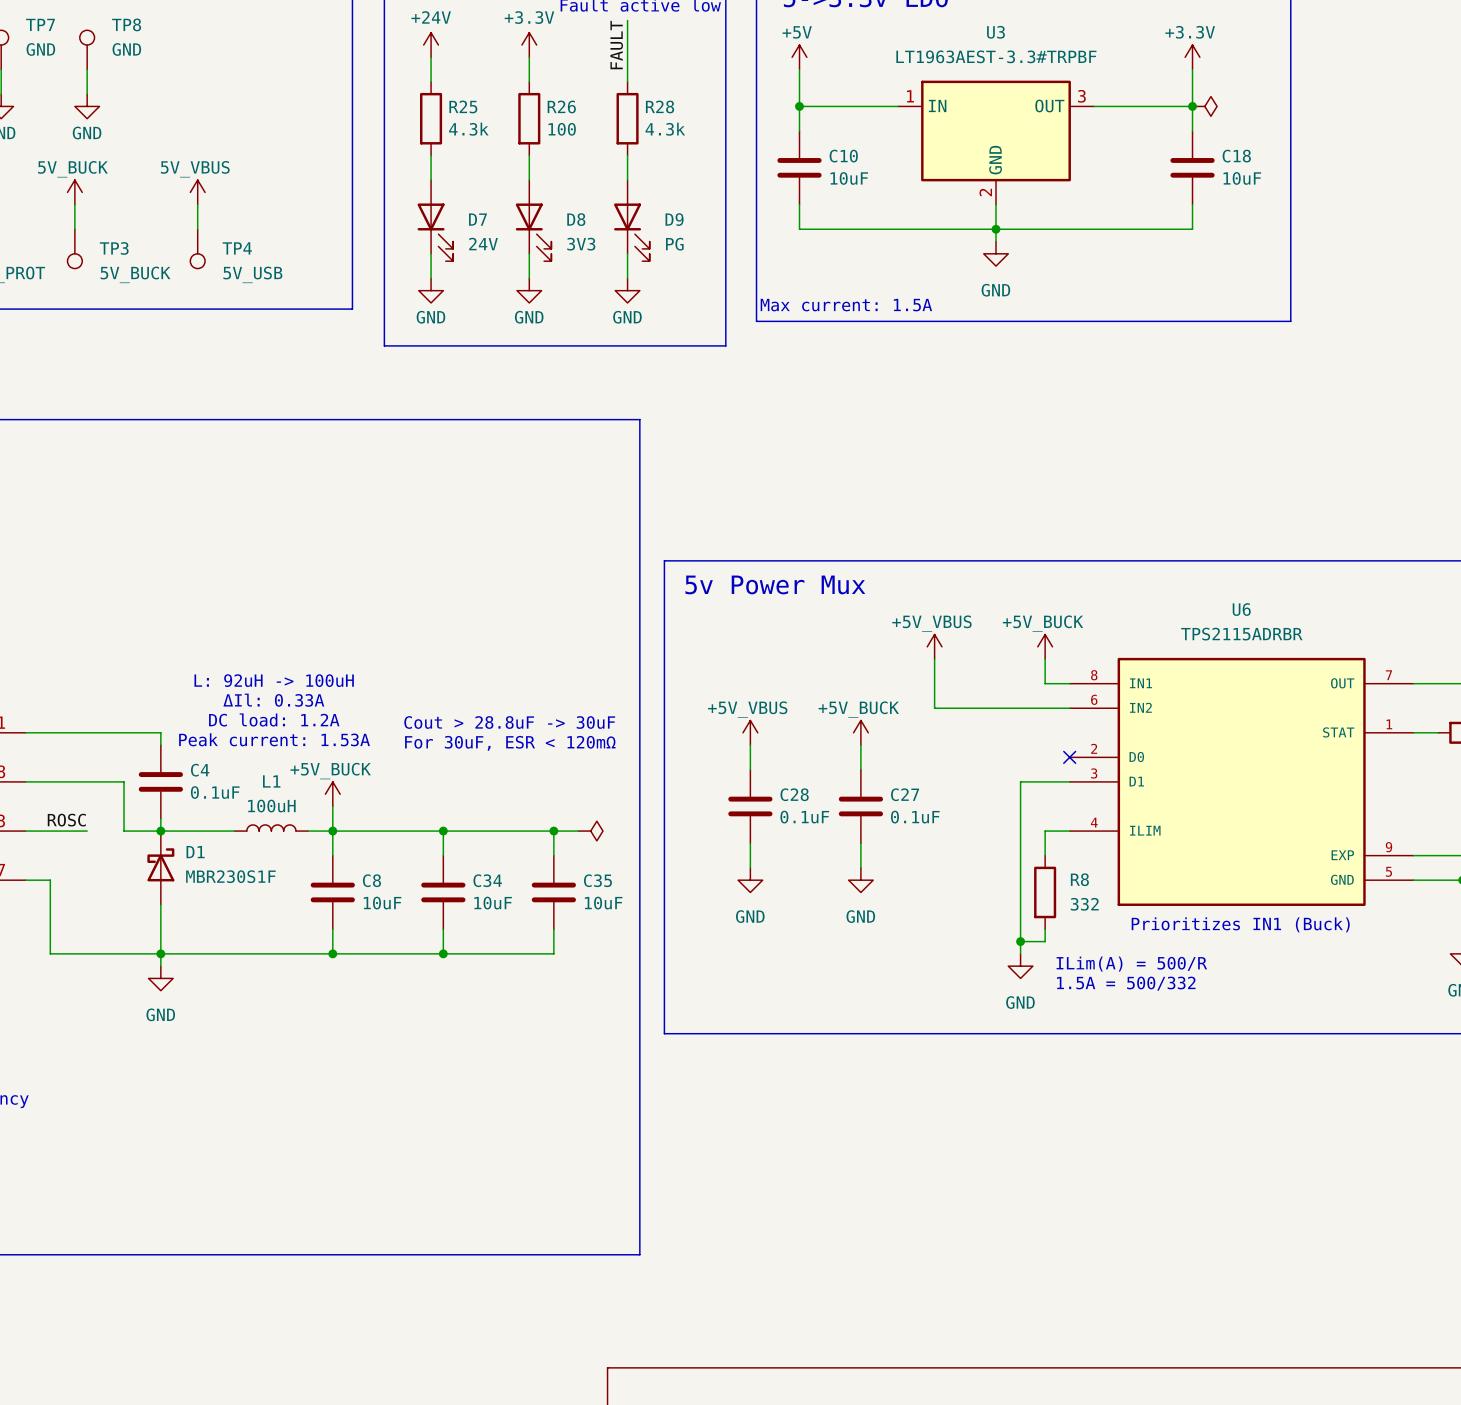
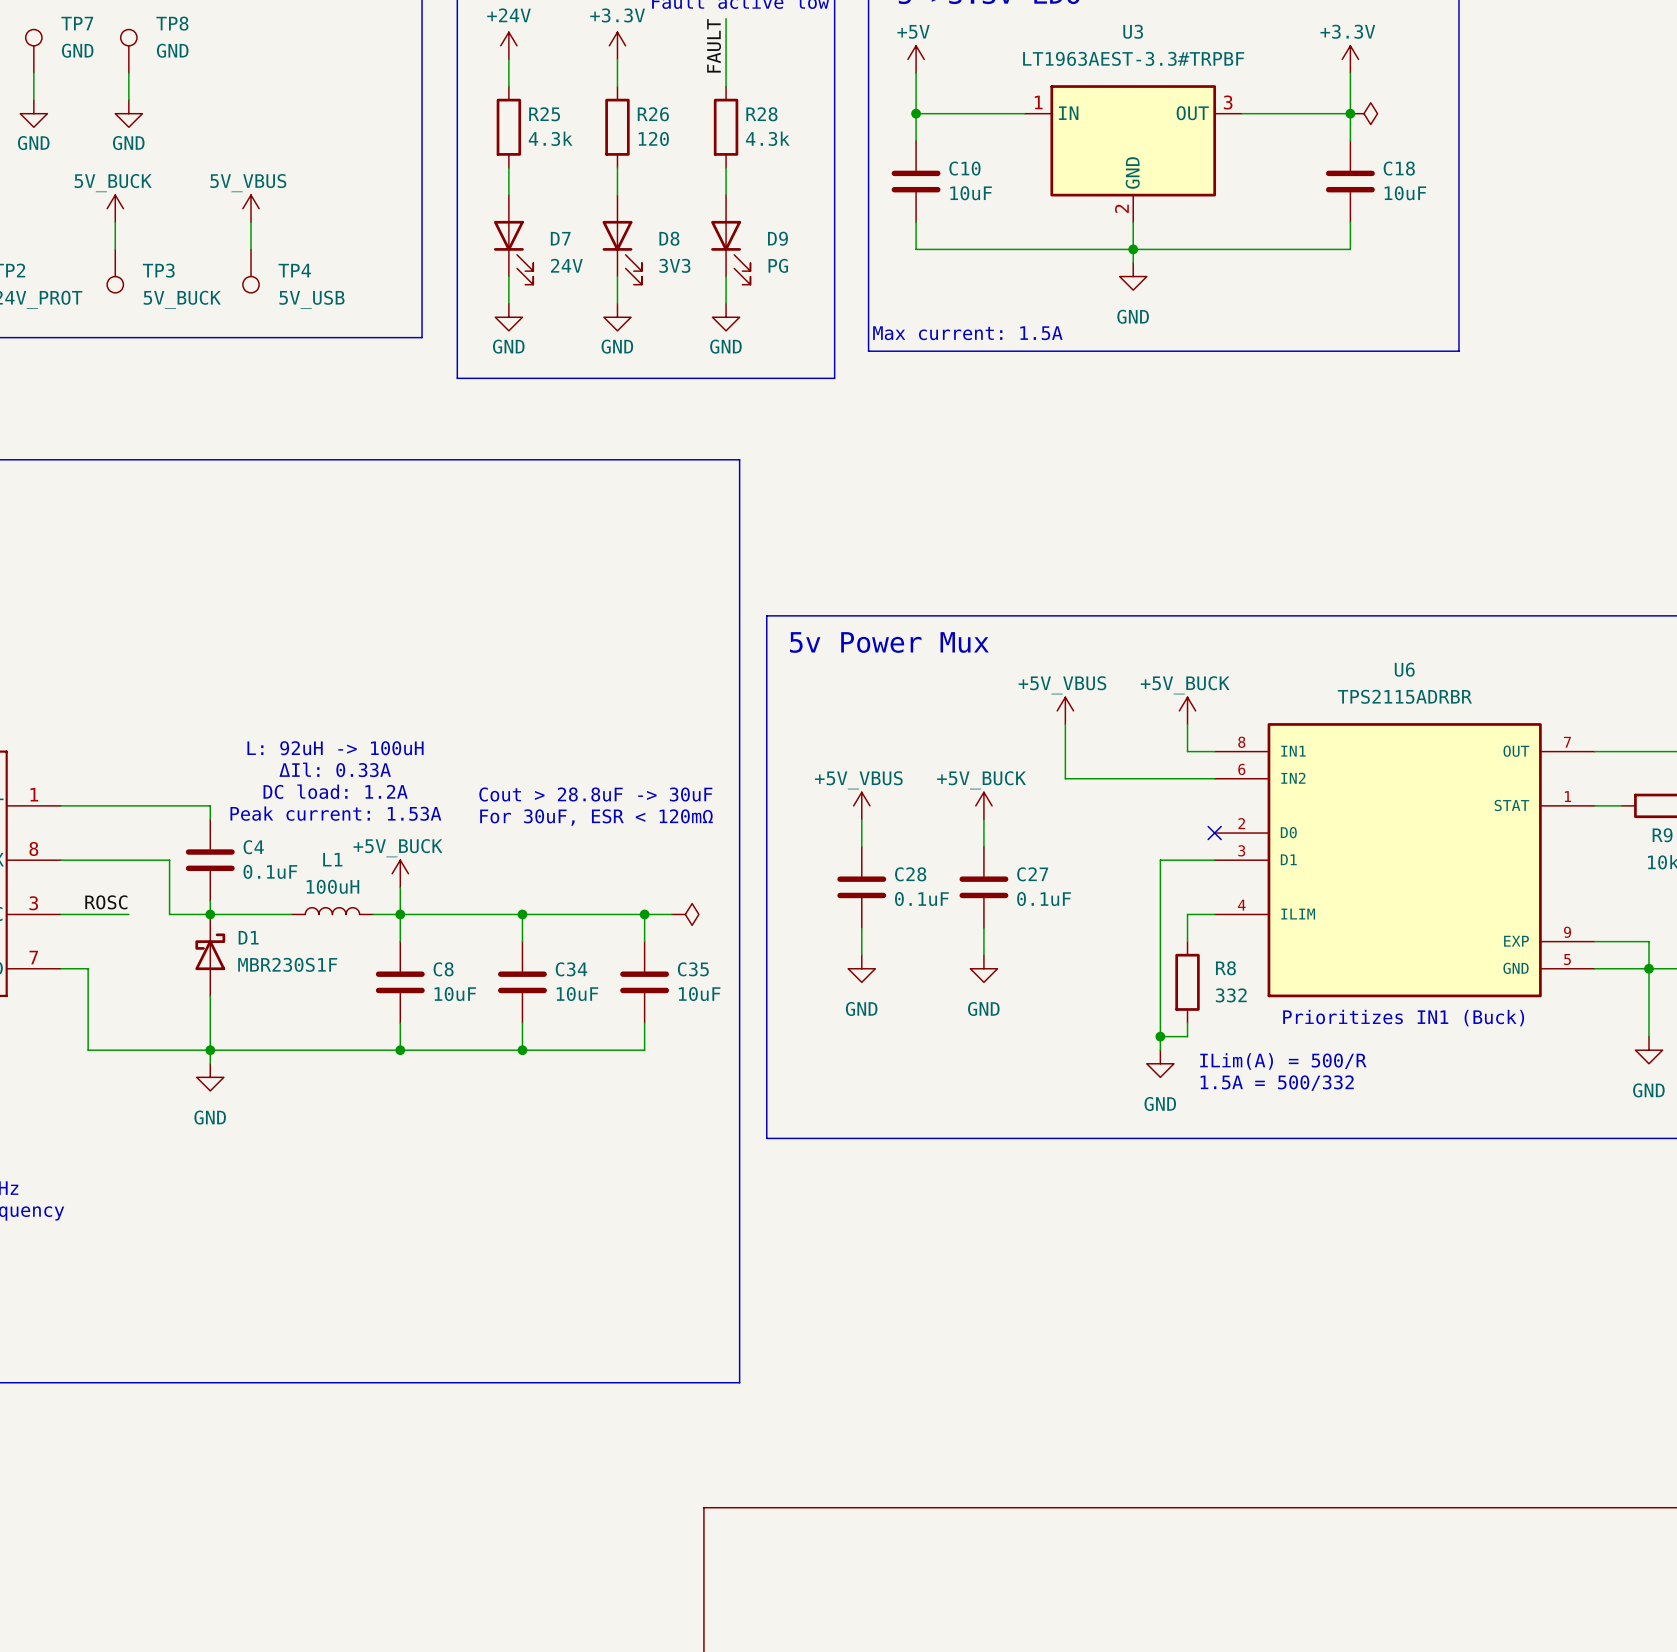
R26 value: 100 (562, 129) -> 120 (653, 138)

